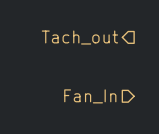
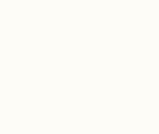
hierarchical label: Tach_out (79, 37) -> none
hierarchical label: Fan_In (90, 96) -> none

